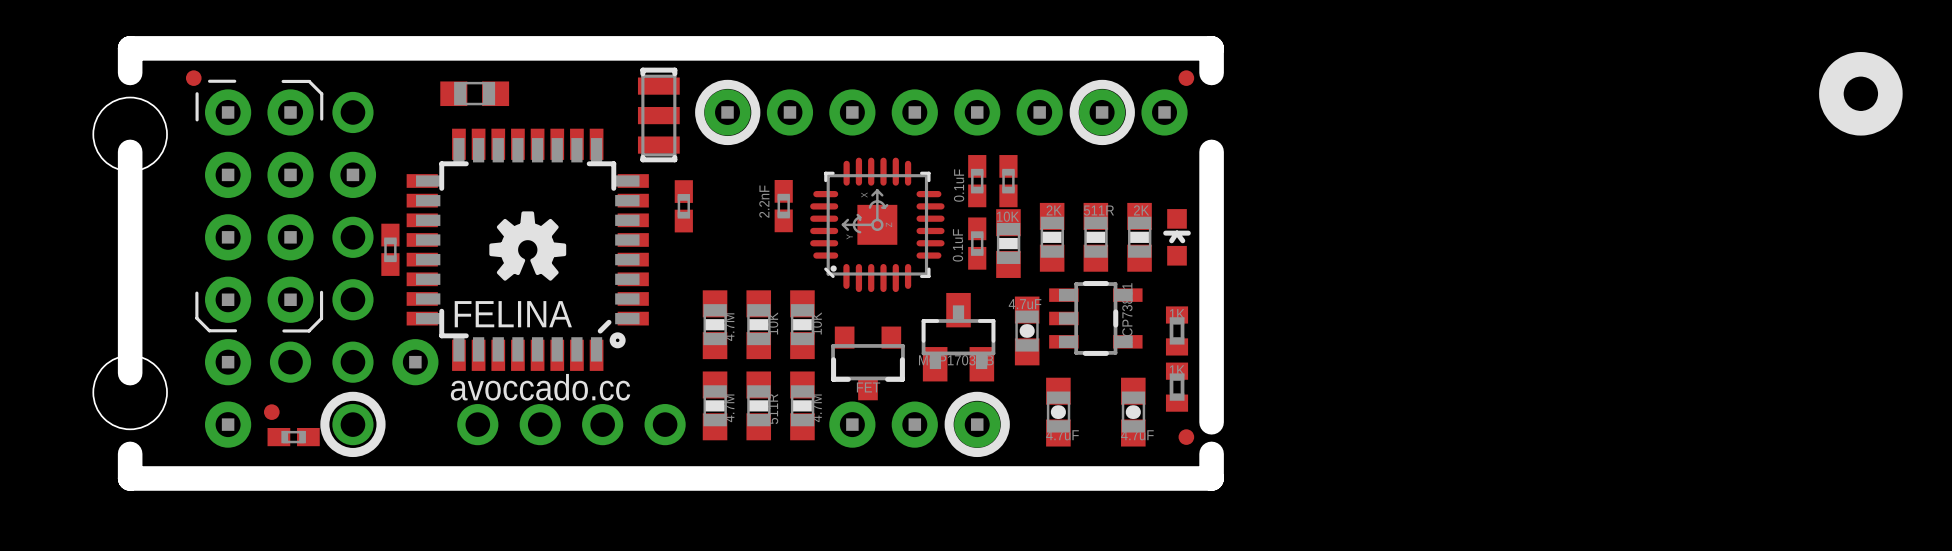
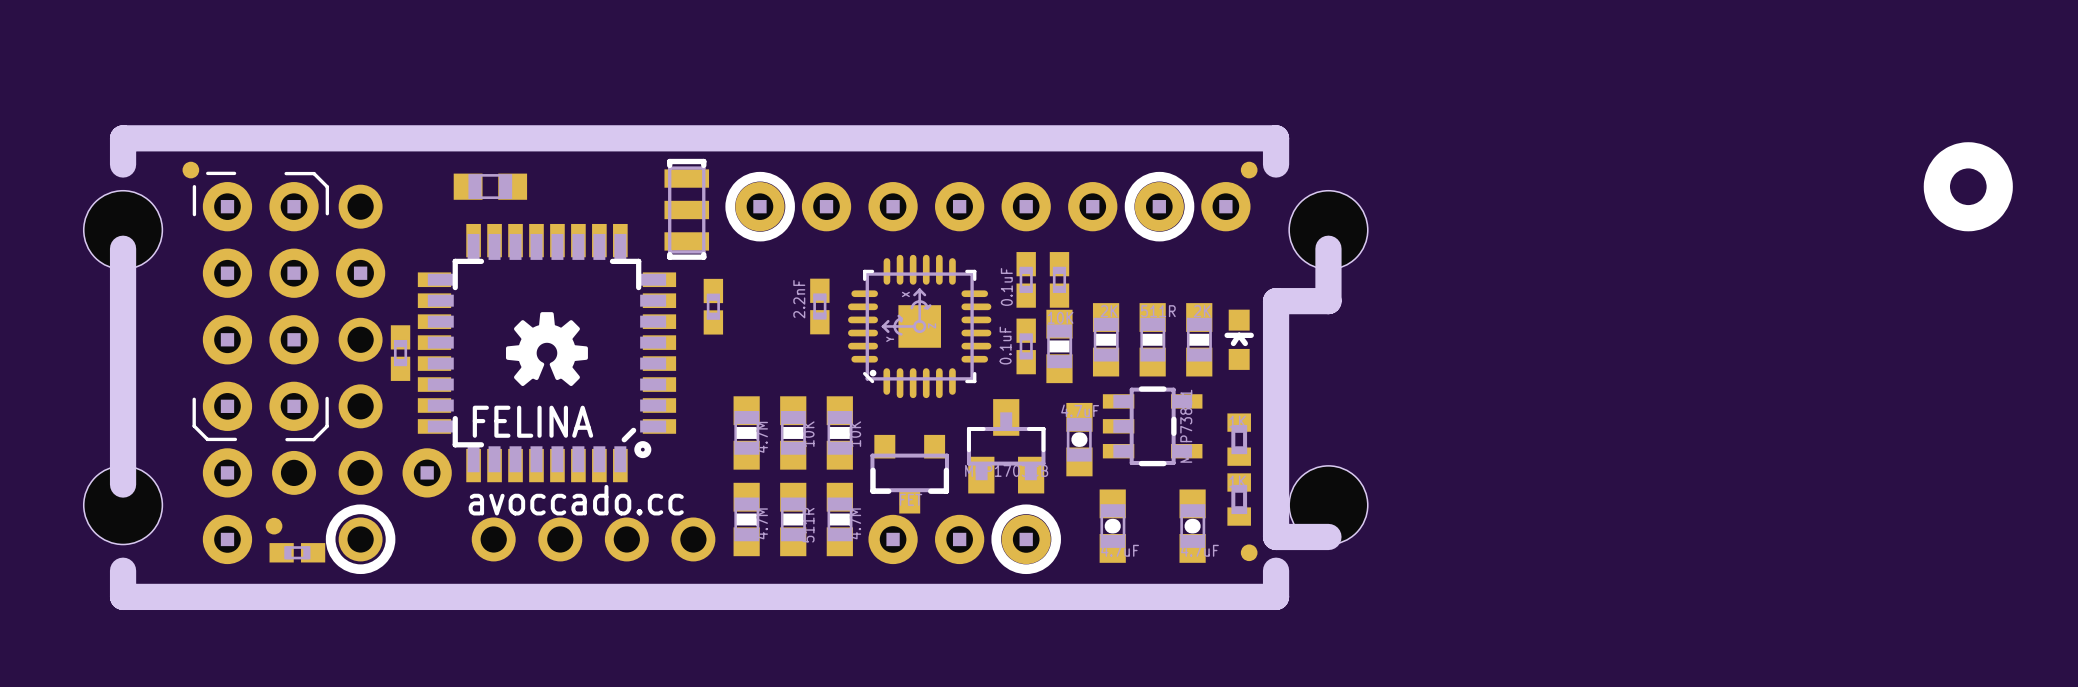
hole: none -> (1328, 230)
board edge: (1211, 151) (1211, 201) -> (1328, 248) (1328, 301) (1276, 301)
hole: none -> (1328, 505)
board edge: none -> (1276, 536) (1328, 536)

